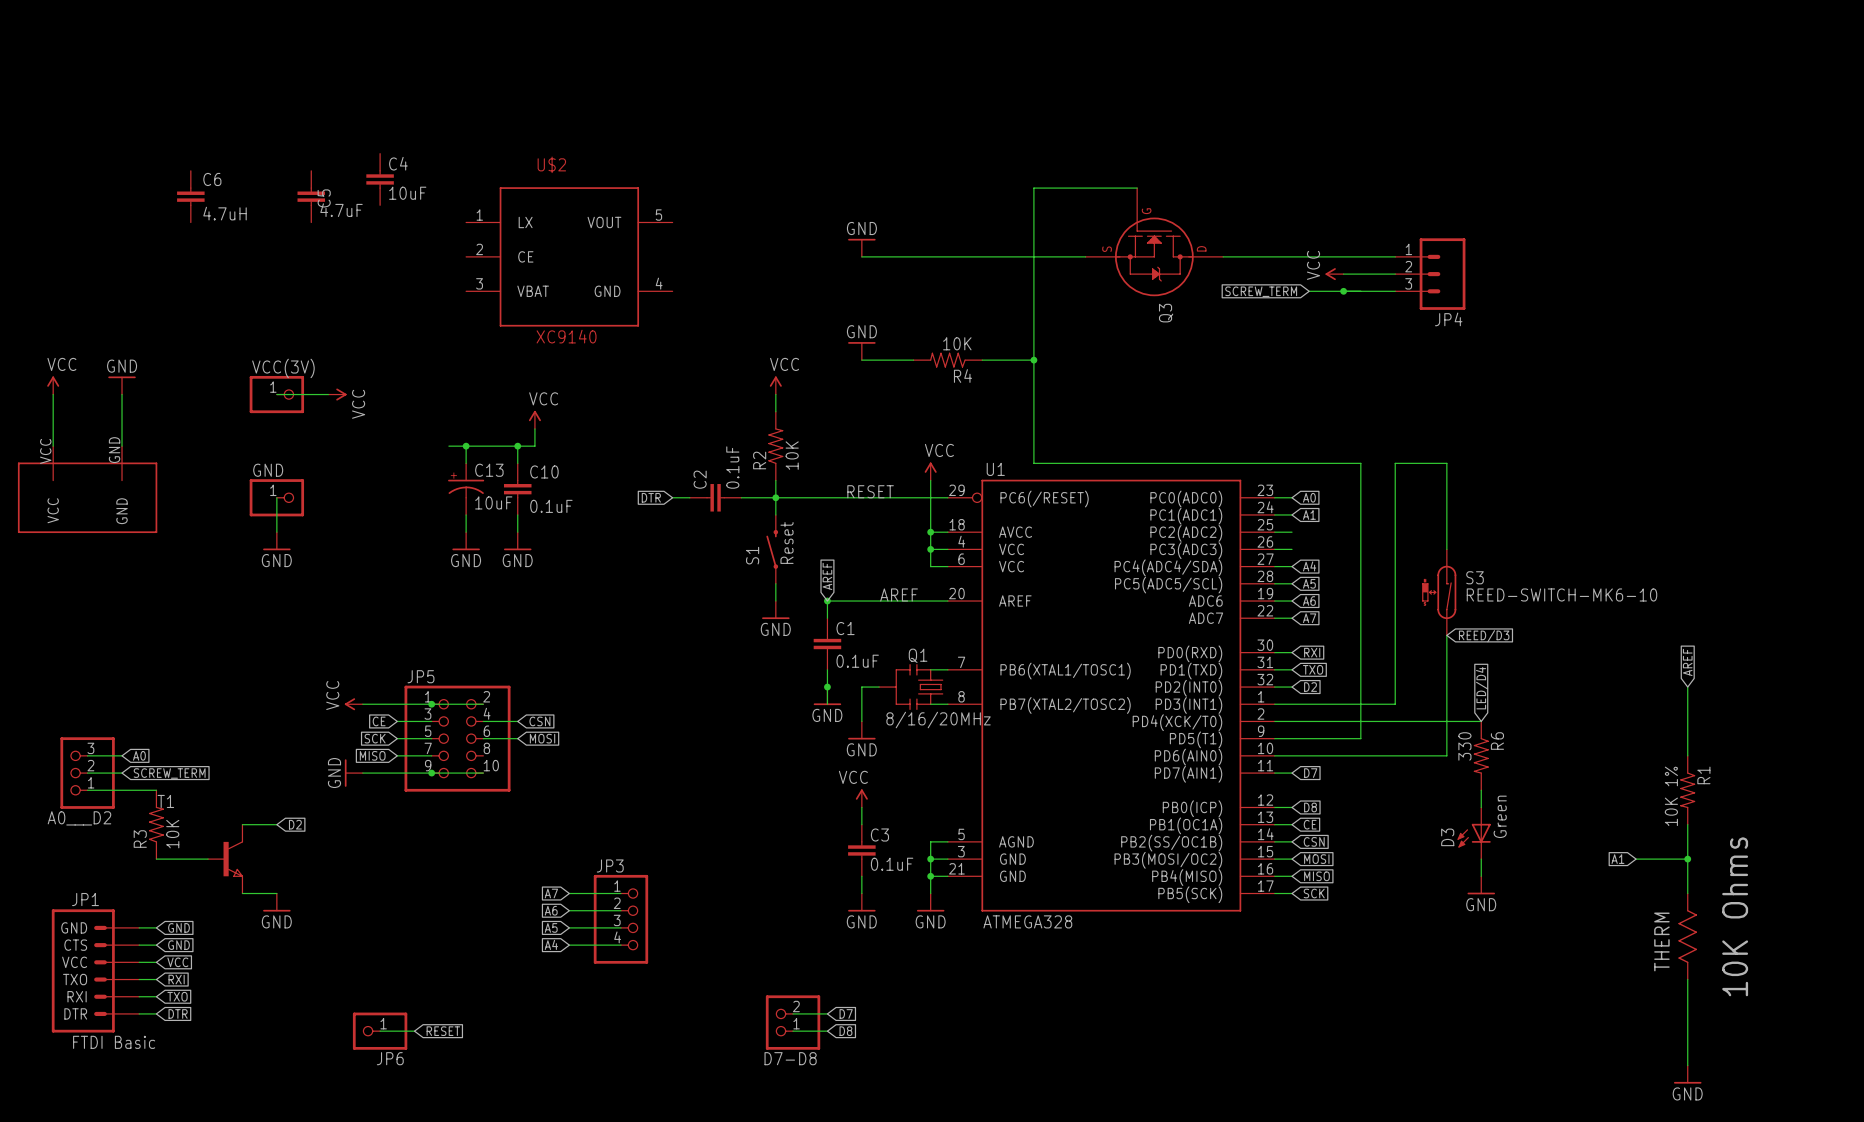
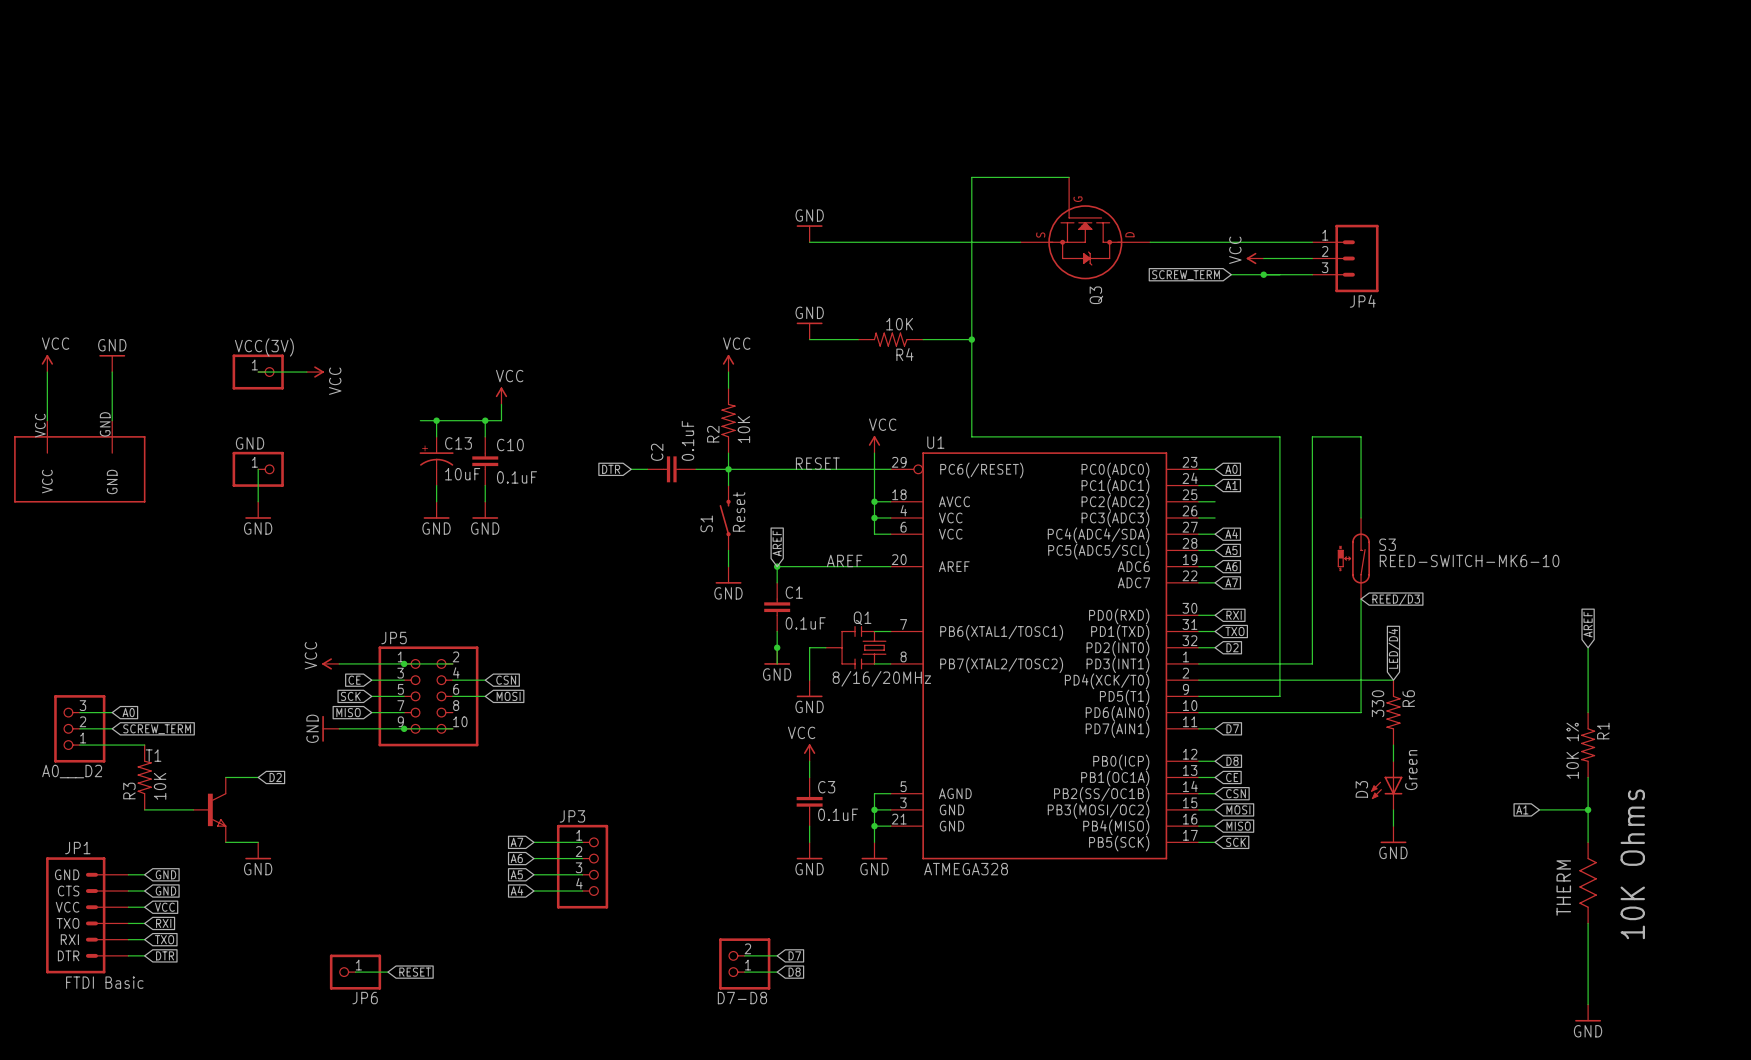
C4: 10uF (380, 179) -> none
C6: 4.7uH (190, 196) -> none
C5: 4.7uF (311, 196) -> none
U$2: XC9140 (569, 256) -> none

